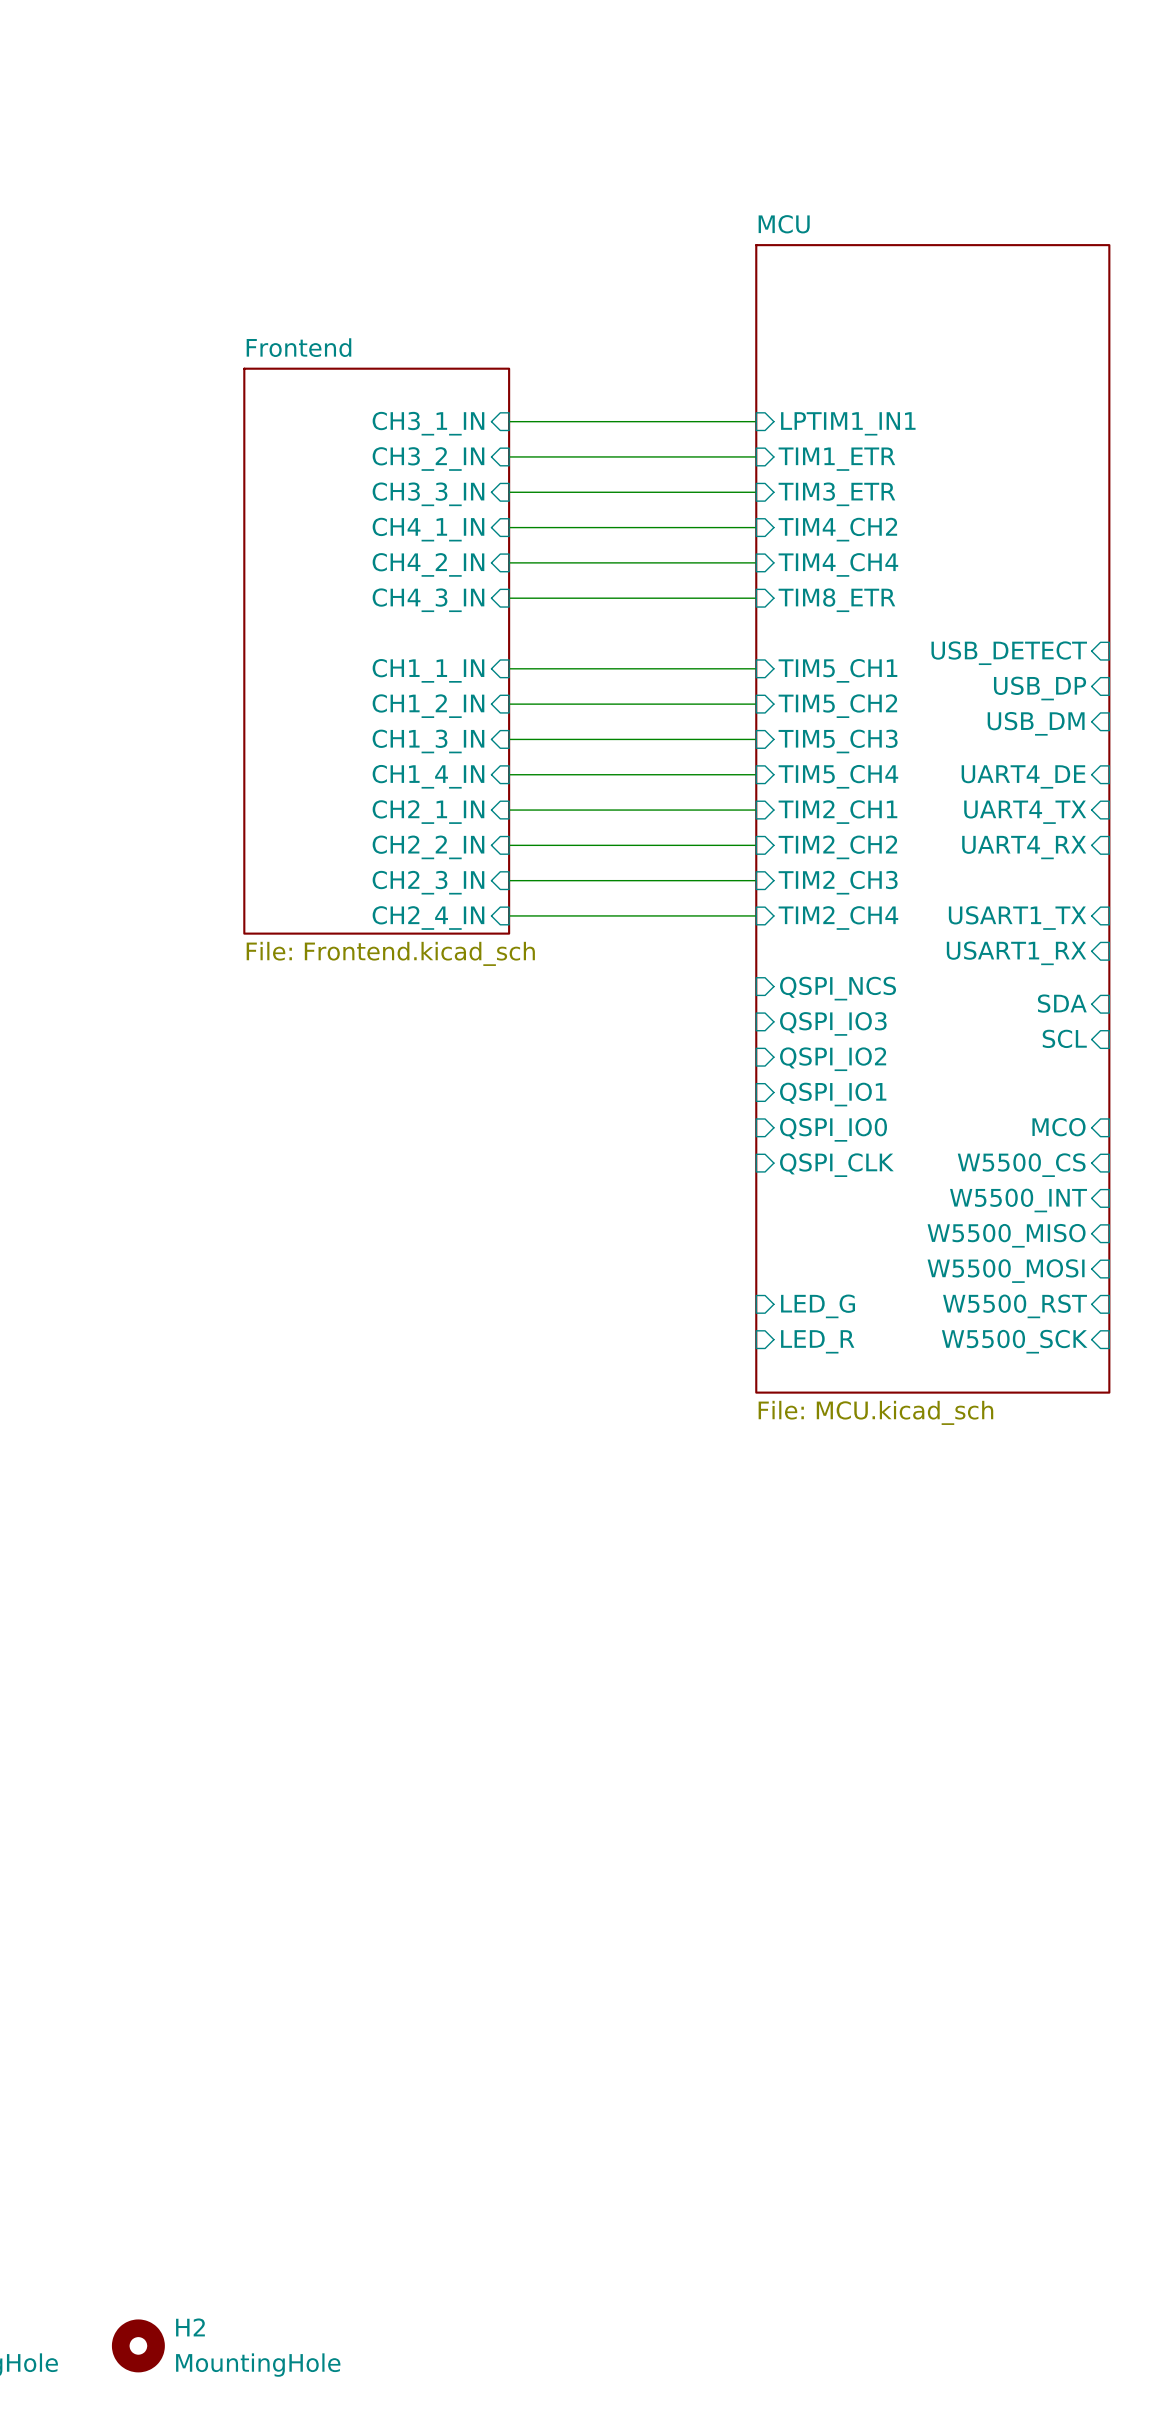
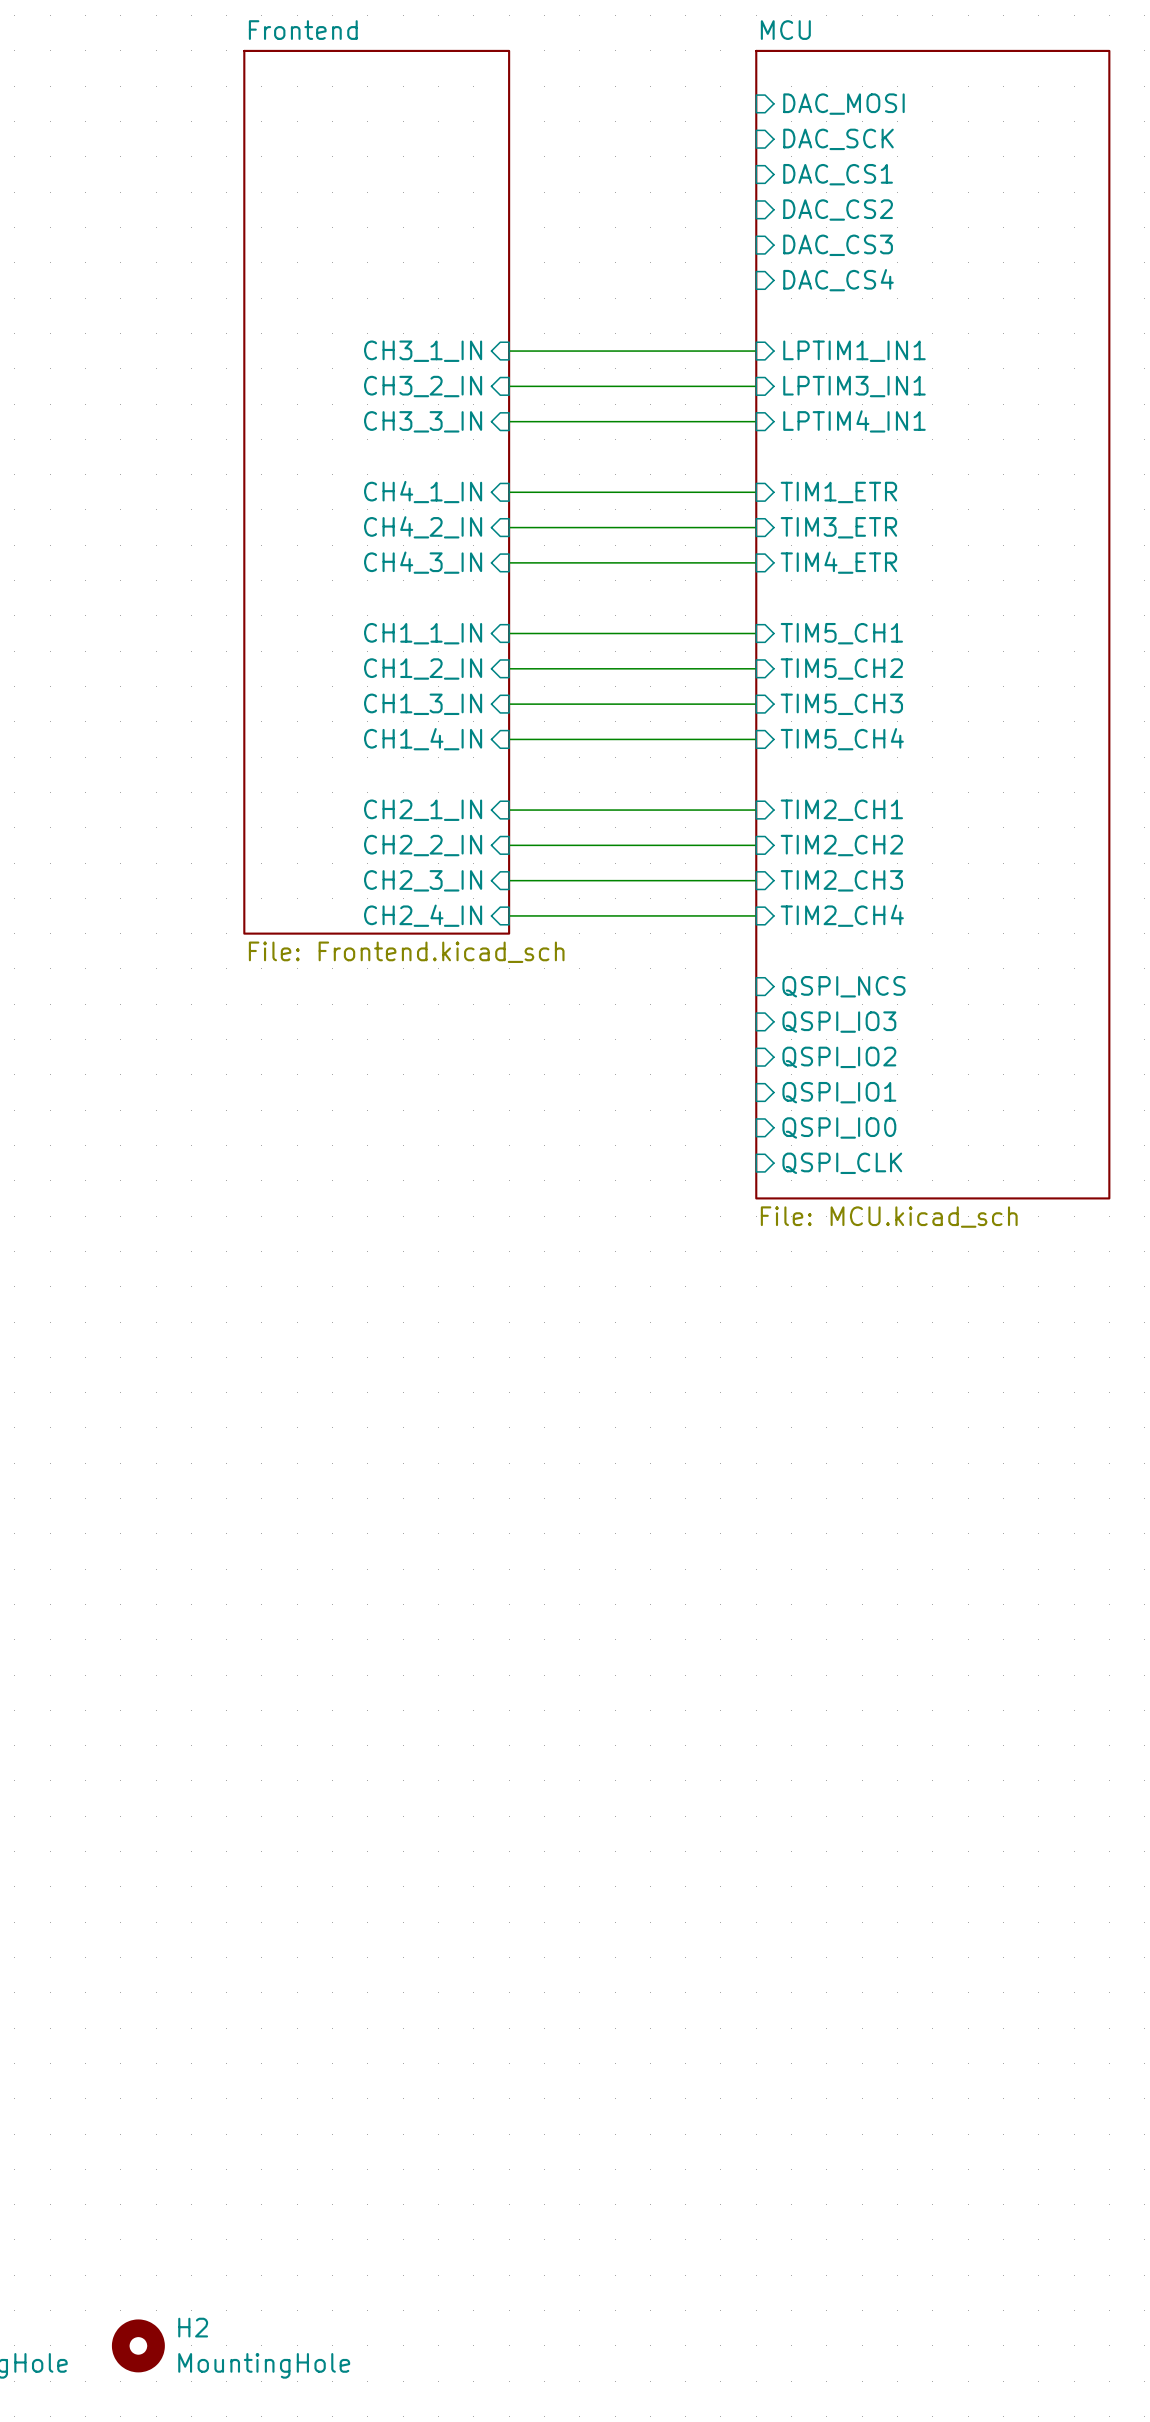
sheet pin: none -> DAC_MOSI (843, 104)
sheet pin: none -> DAC_SCK (838, 139)
sheet pin: none -> DAC_CS1 (838, 174)
sheet pin: none -> DAC_CS2 (838, 209)
sheet pin: none -> DAC_CS3 (838, 245)
sheet pin: none -> DAC_CS4 (838, 280)
wire: none -> (509, 351) (756, 351)
sheet pin: none -> CH3_1_IN (423, 351)
sheet pin: none -> LPTIM1_IN1 (854, 351)
sheet pin: none -> LPTIM3_IN1 (854, 386)
sheet pin: CH3_1_IN (428, 423) -> CH3_3_IN (423, 421)
sheet pin: LPTIM1_IN1 (848, 423) -> LPTIM4_IN1 (854, 421)
wire: (509, 456) (756, 456) -> (509, 386) (756, 386)
sheet pin position: CH3_2_IN (428, 459) -> CH3_2_IN (423, 386)
sheet pin: TIM1_ETR (836, 459) -> none
sheet Frontend: none -> File: Frontend.kicad_sch (376, 492)
sheet pin: CH3_3_IN (428, 494) -> CH4_1_IN (423, 492)
sheet pin: TIM3_ETR (836, 494) -> TIM1_ETR (838, 492)
sheet pin: CH4_1_IN (428, 529) -> CH4_2_IN (423, 527)
sheet pin: TIM4_CH2 (837, 529) -> TIM3_ETR (838, 527)
sheet pin: CH4_2_IN (428, 564) -> CH4_3_IN (423, 562)
sheet pin: TIM4_CH4 (838, 564) -> TIM4_ETR (838, 562)
wire: (509, 598) (756, 598) -> (509, 633) (756, 633)
sheet pin: CH4_3_IN (428, 600) -> CH1_1_IN (423, 633)
sheet pin: TIM8_ETR (836, 600) -> none
sheet pin: none -> TIM5_CH1 (841, 633)
sheet Frontend: File: Frontend.kicad_sch (376, 651) -> none
sheet pin: USB_DETECT (1009, 653) -> none
sheet pin: CH1_1_IN (428, 670) -> CH1_2_IN (423, 668)
sheet pin: TIM5_CH1 (837, 670) -> TIM5_CH2 (841, 668)
sheet pin: USB_DP (1040, 688) -> none
sheet pin: CH1_2_IN (428, 706) -> CH1_3_IN (423, 704)
sheet pin: TIM5_CH2 (837, 706) -> TIM5_CH3 (841, 704)
sheet pin: USB_DM (1036, 723) -> none
sheet pin: CH1_3_IN (428, 741) -> CH1_4_IN (423, 739)
sheet pin: TIM5_CH3 (838, 741) -> TIM5_CH4 (842, 739)
wire: (509, 774) (756, 774) -> none
sheet pin: CH1_4_IN (428, 776) -> none
sheet pin: TIM5_CH4 (838, 776) -> none
sheet pin: UART4_DE (1023, 776) -> none
sheet pin: UART4_TX (1025, 812) -> none
sheet MCU position: (932, 818) -> (932, 624)
sheet pin: UART4_RX (1024, 847) -> none
sheet pin: USART1_TX (1017, 918) -> none
sheet pin: USART1_RX (1016, 953) -> none
sheet pin: SDA (1062, 1003) -> none
sheet pin: SCL (1064, 1038) -> none
sheet pin: MCO (1059, 1127) -> none
sheet pin: W5500_CS (1021, 1165) -> none
sheet pin: W5500_INT (1018, 1200) -> none
sheet pin: W5500_MISO (1006, 1235) -> none
sheet pin: W5500_MOSI (1006, 1271) -> none
sheet pin: LED_G (818, 1306) -> none
sheet pin: W5500_RST (1015, 1306) -> none
sheet pin: LED_R (817, 1341) -> none
sheet pin: W5500_SCK (1014, 1341) -> none

